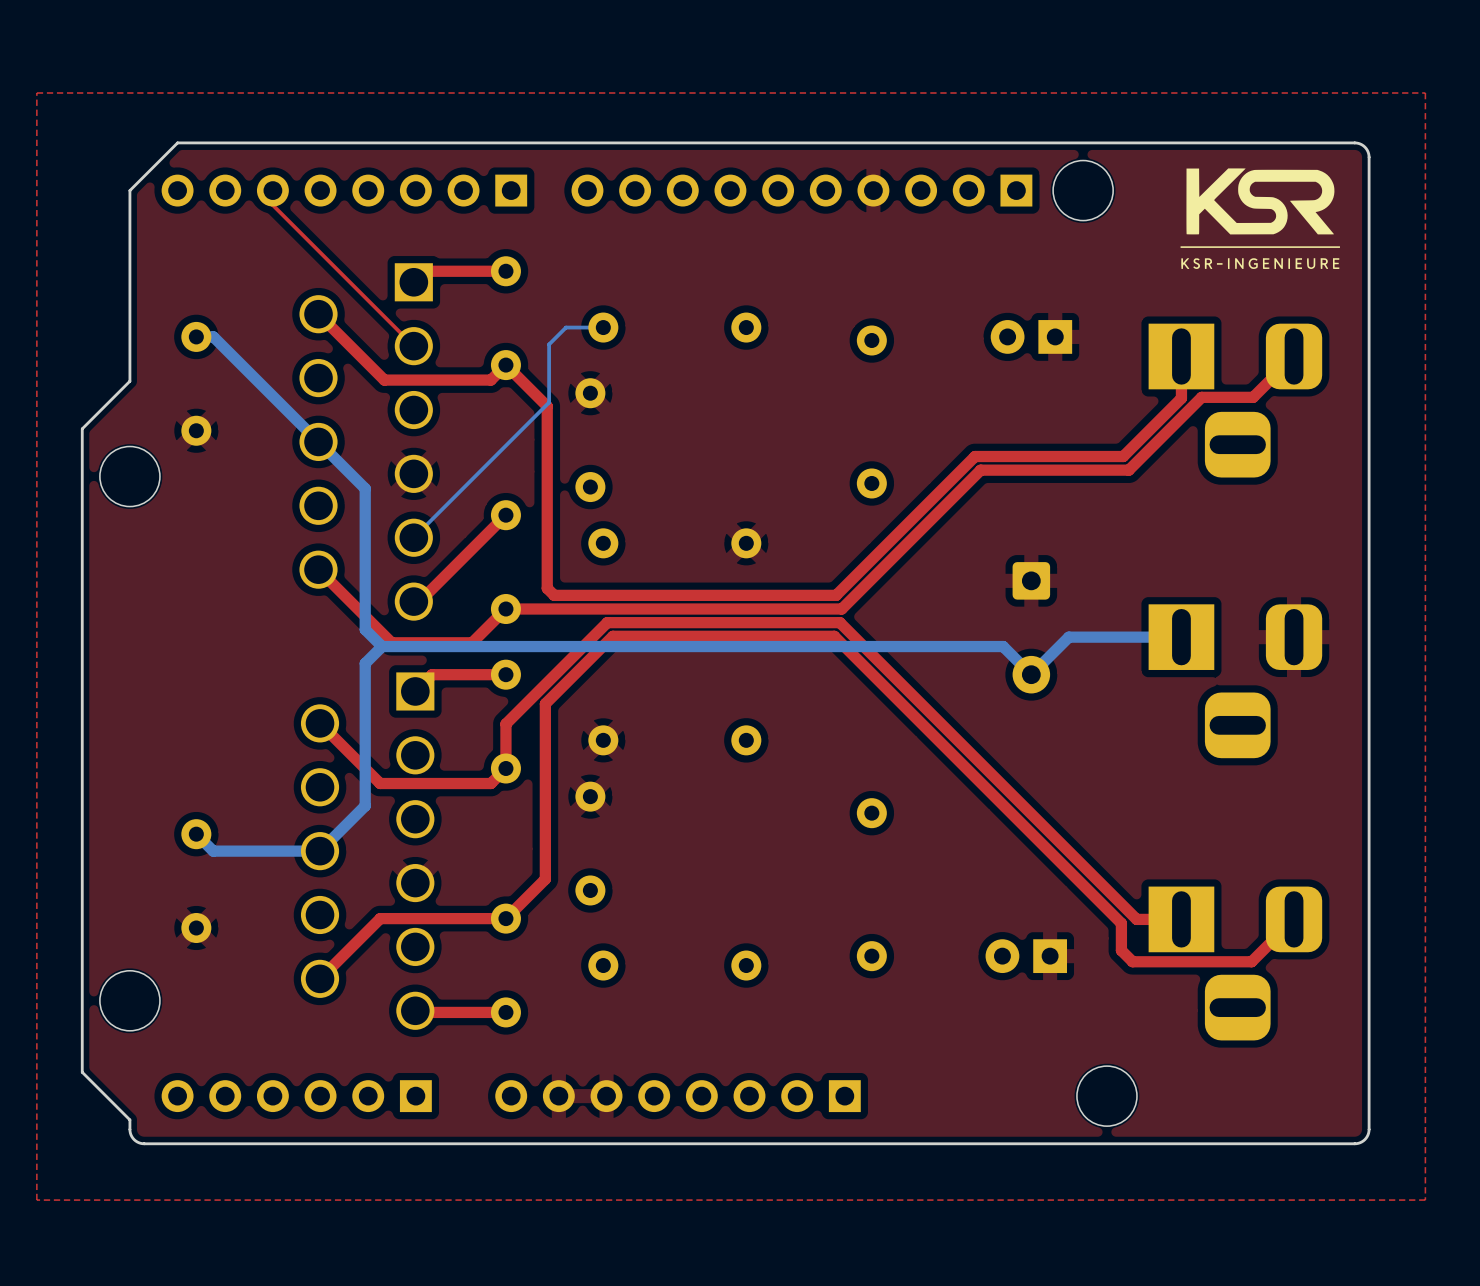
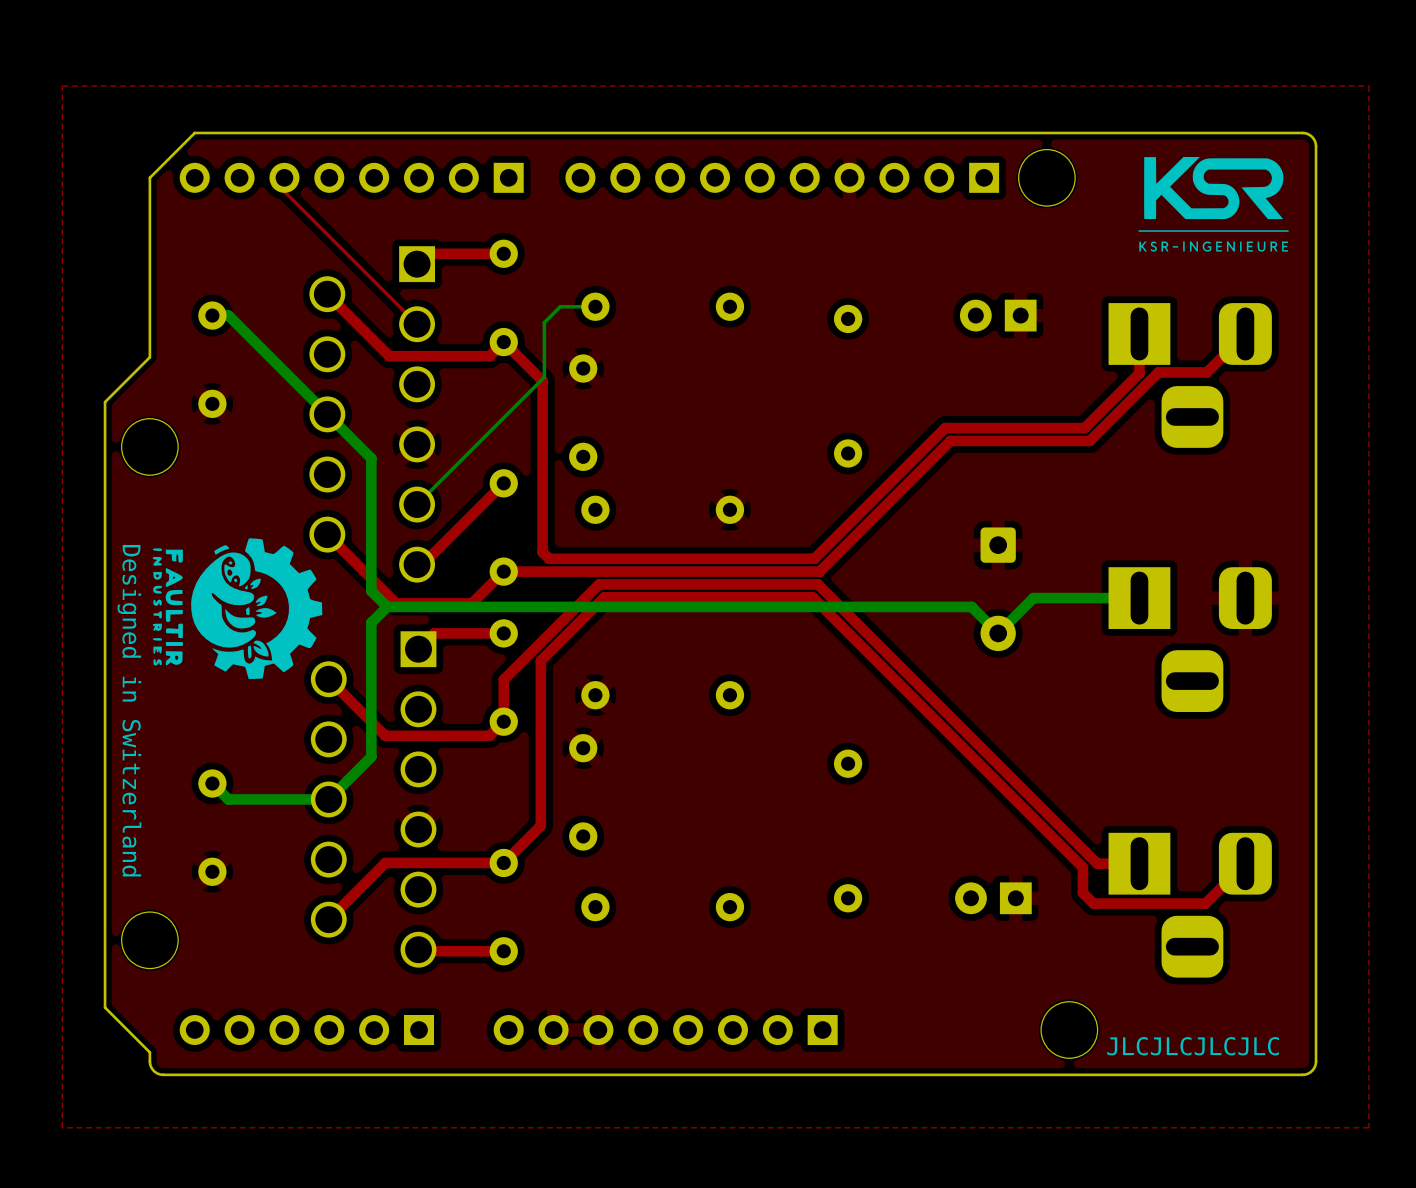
drawing: none -> [152, 538, 323, 680]
text: none -> Designed in Switzerland (129, 710)
text: none -> JLCJLCJLCJLC (1193, 1046)

